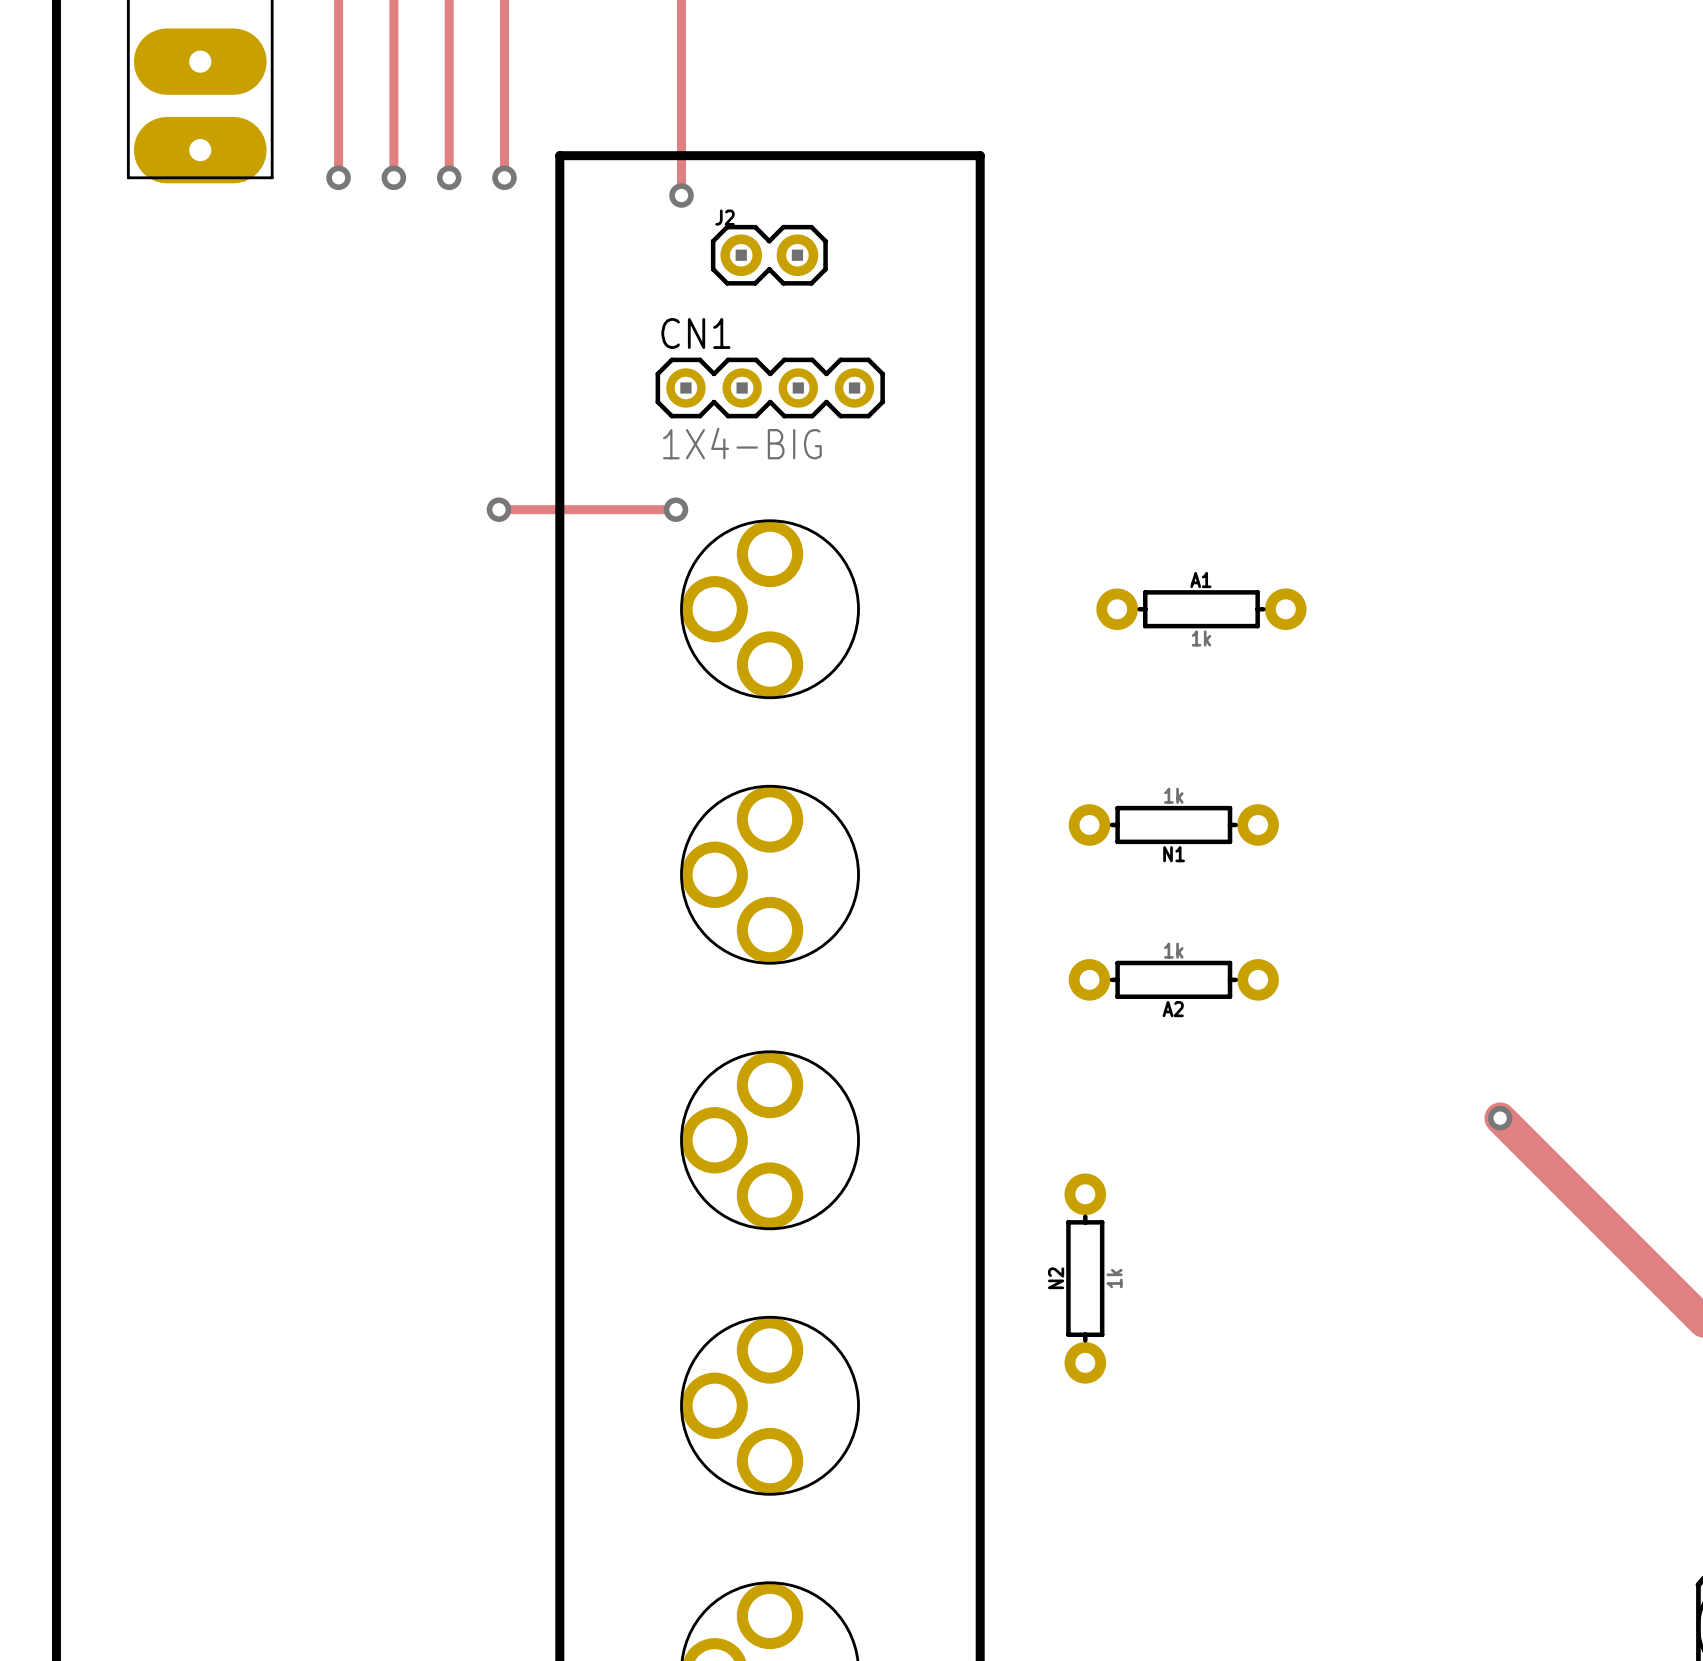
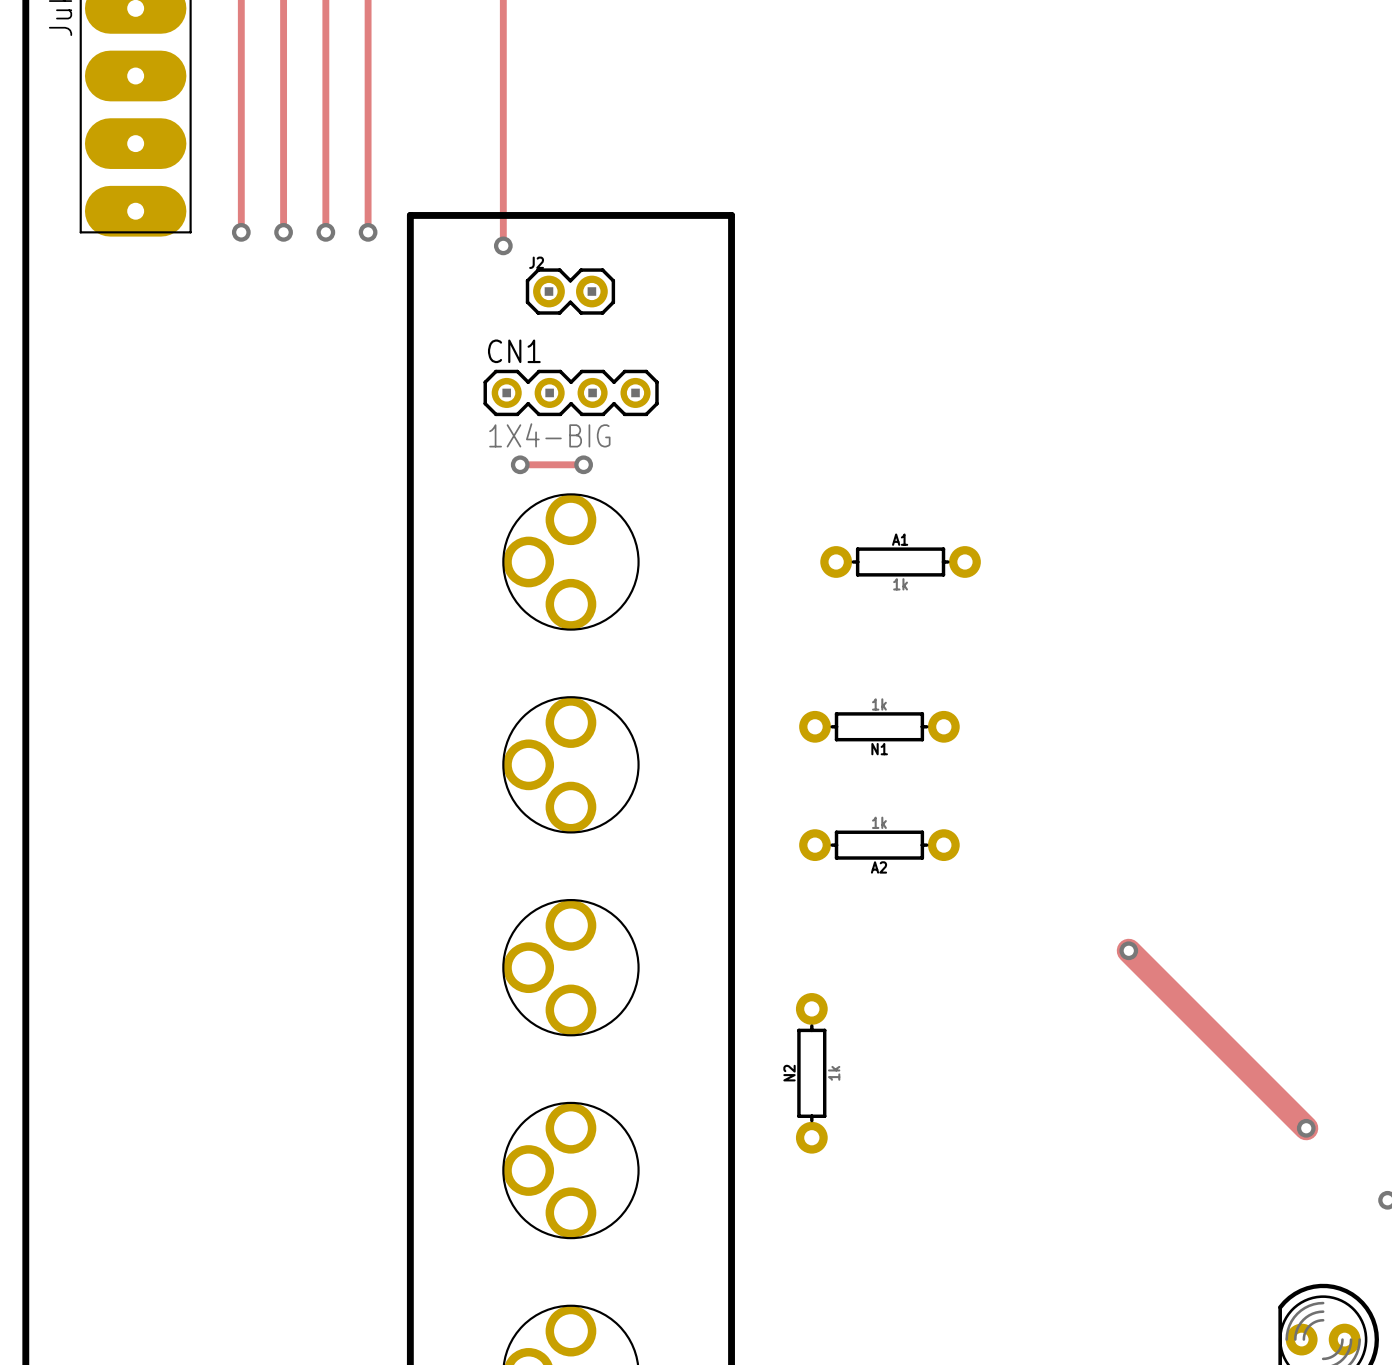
track: none -> (520, 464) (583, 464)
via: none -> (583, 464)
track: (498, 509) (675, 509) -> none
via: (498, 509) -> none
via position: (675, 509) -> (520, 464)

